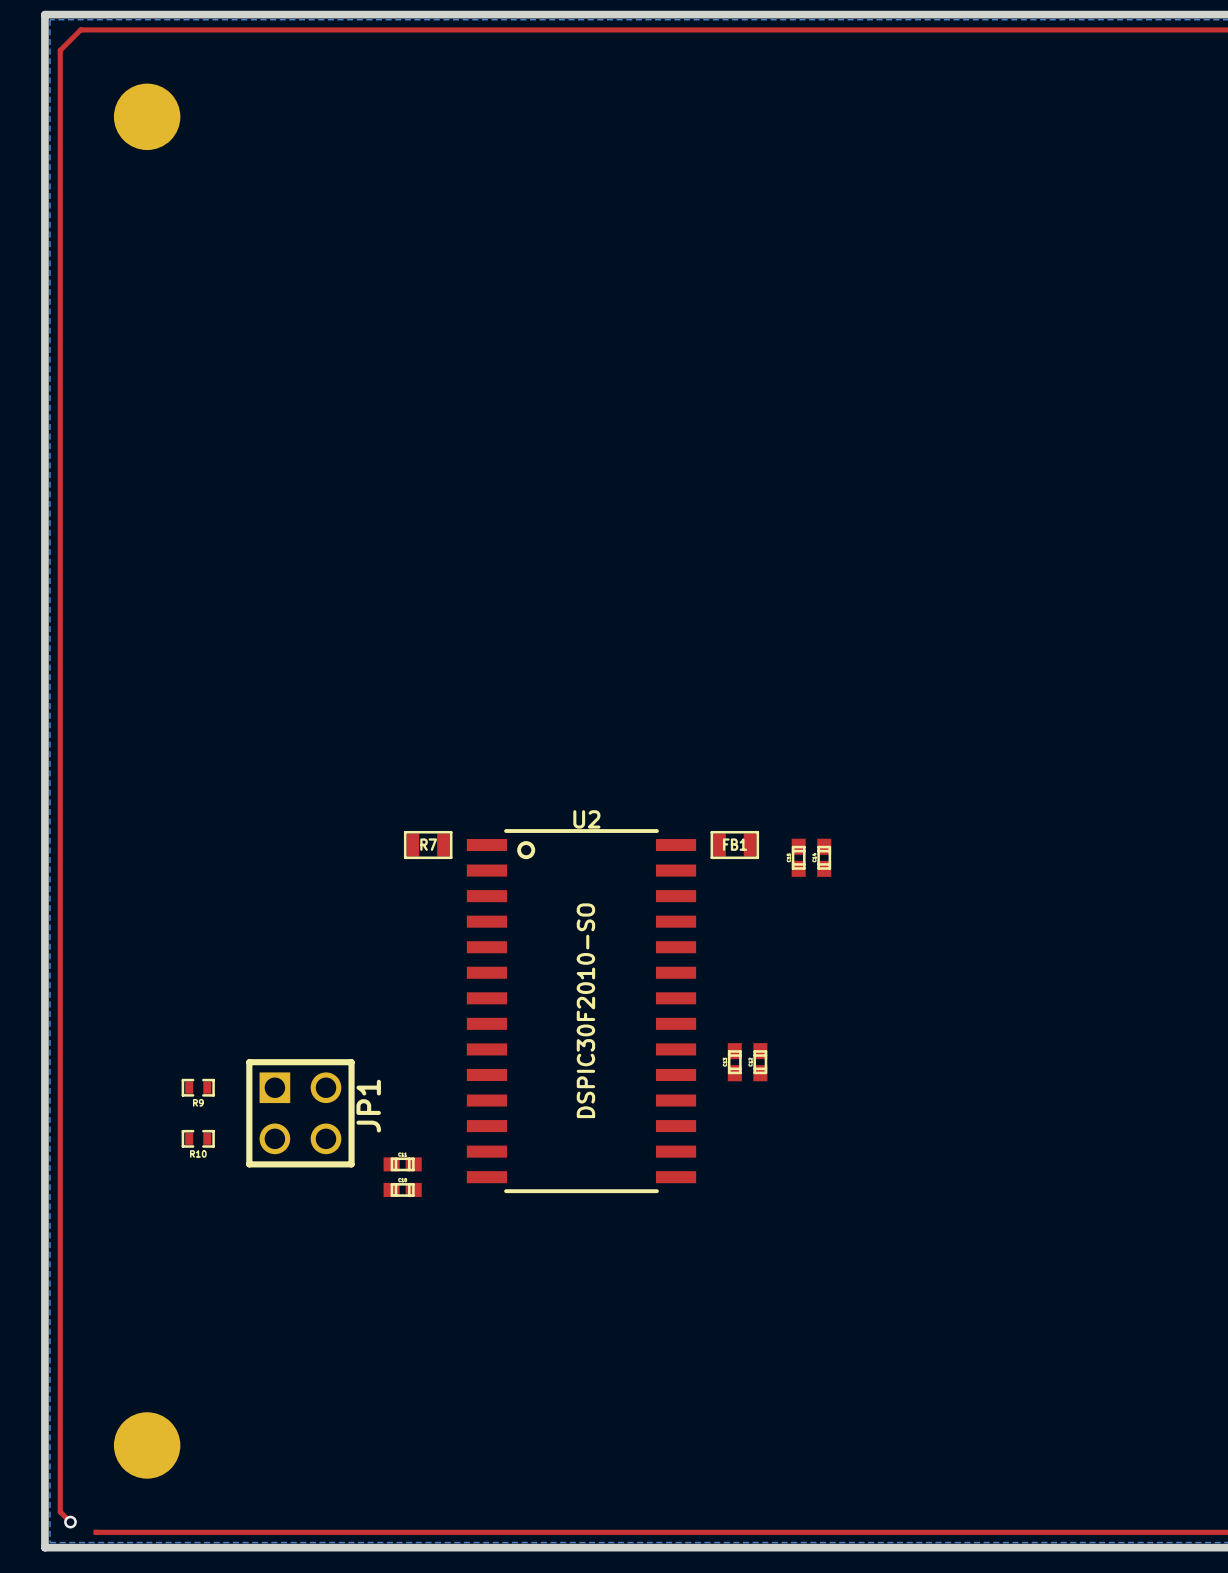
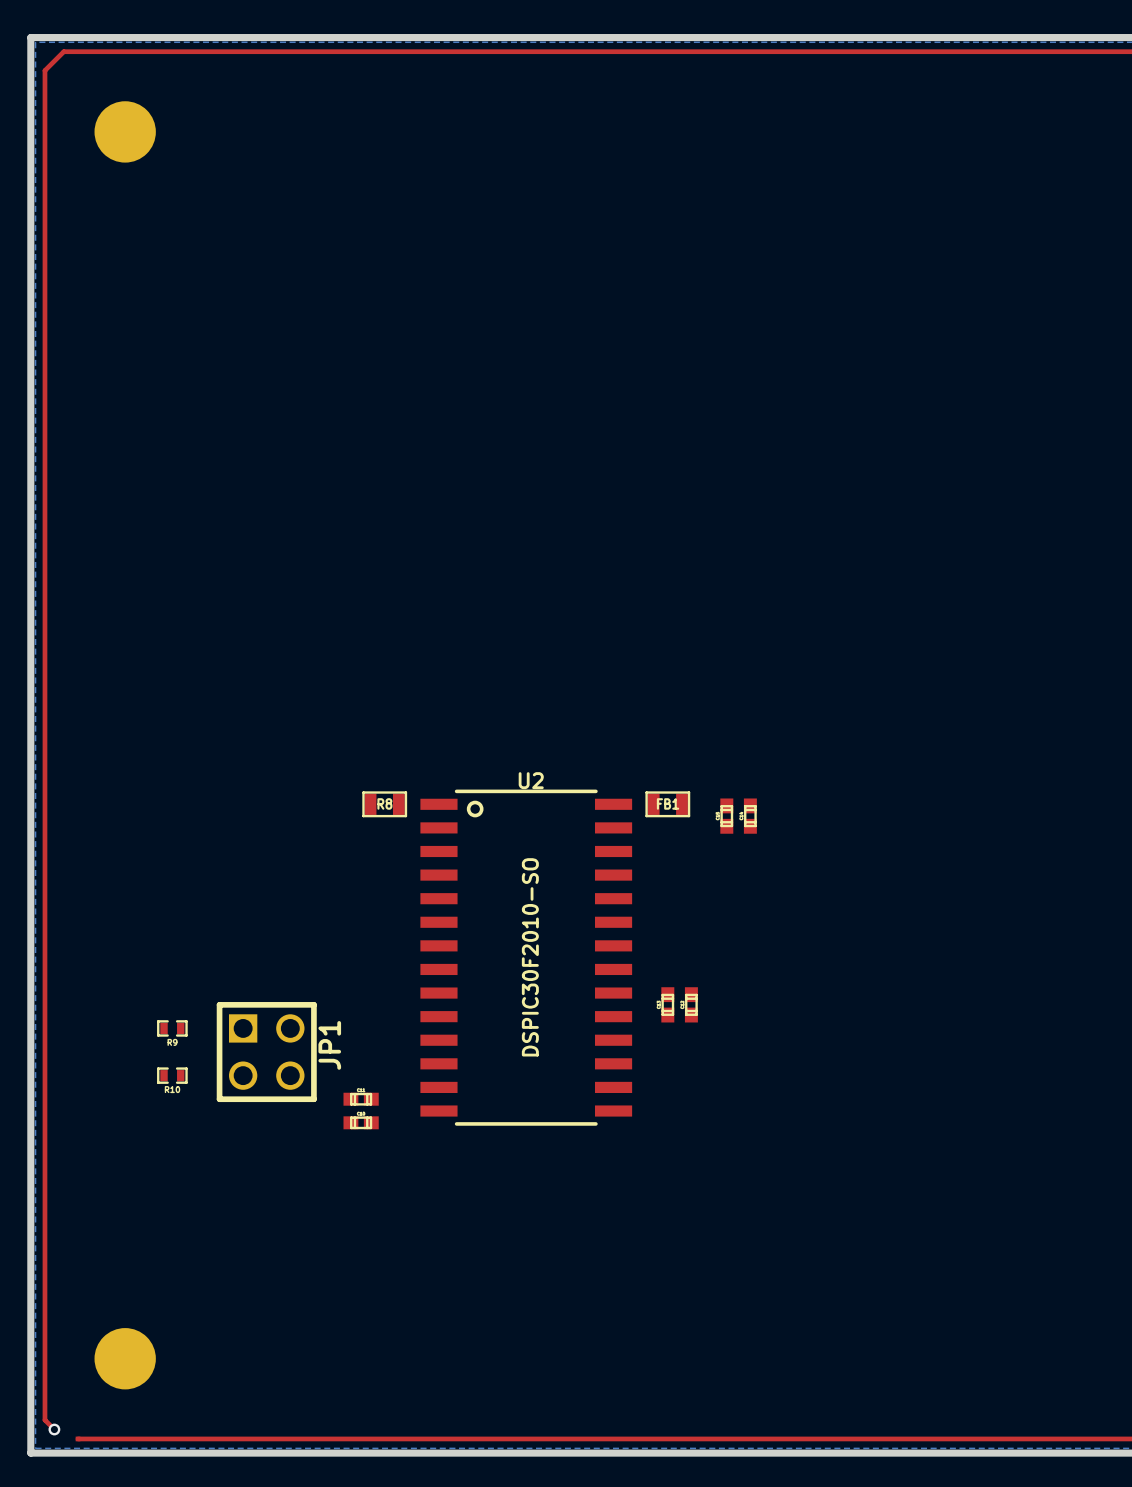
R7 name: R7 (428, 844) -> R8 (384, 803)

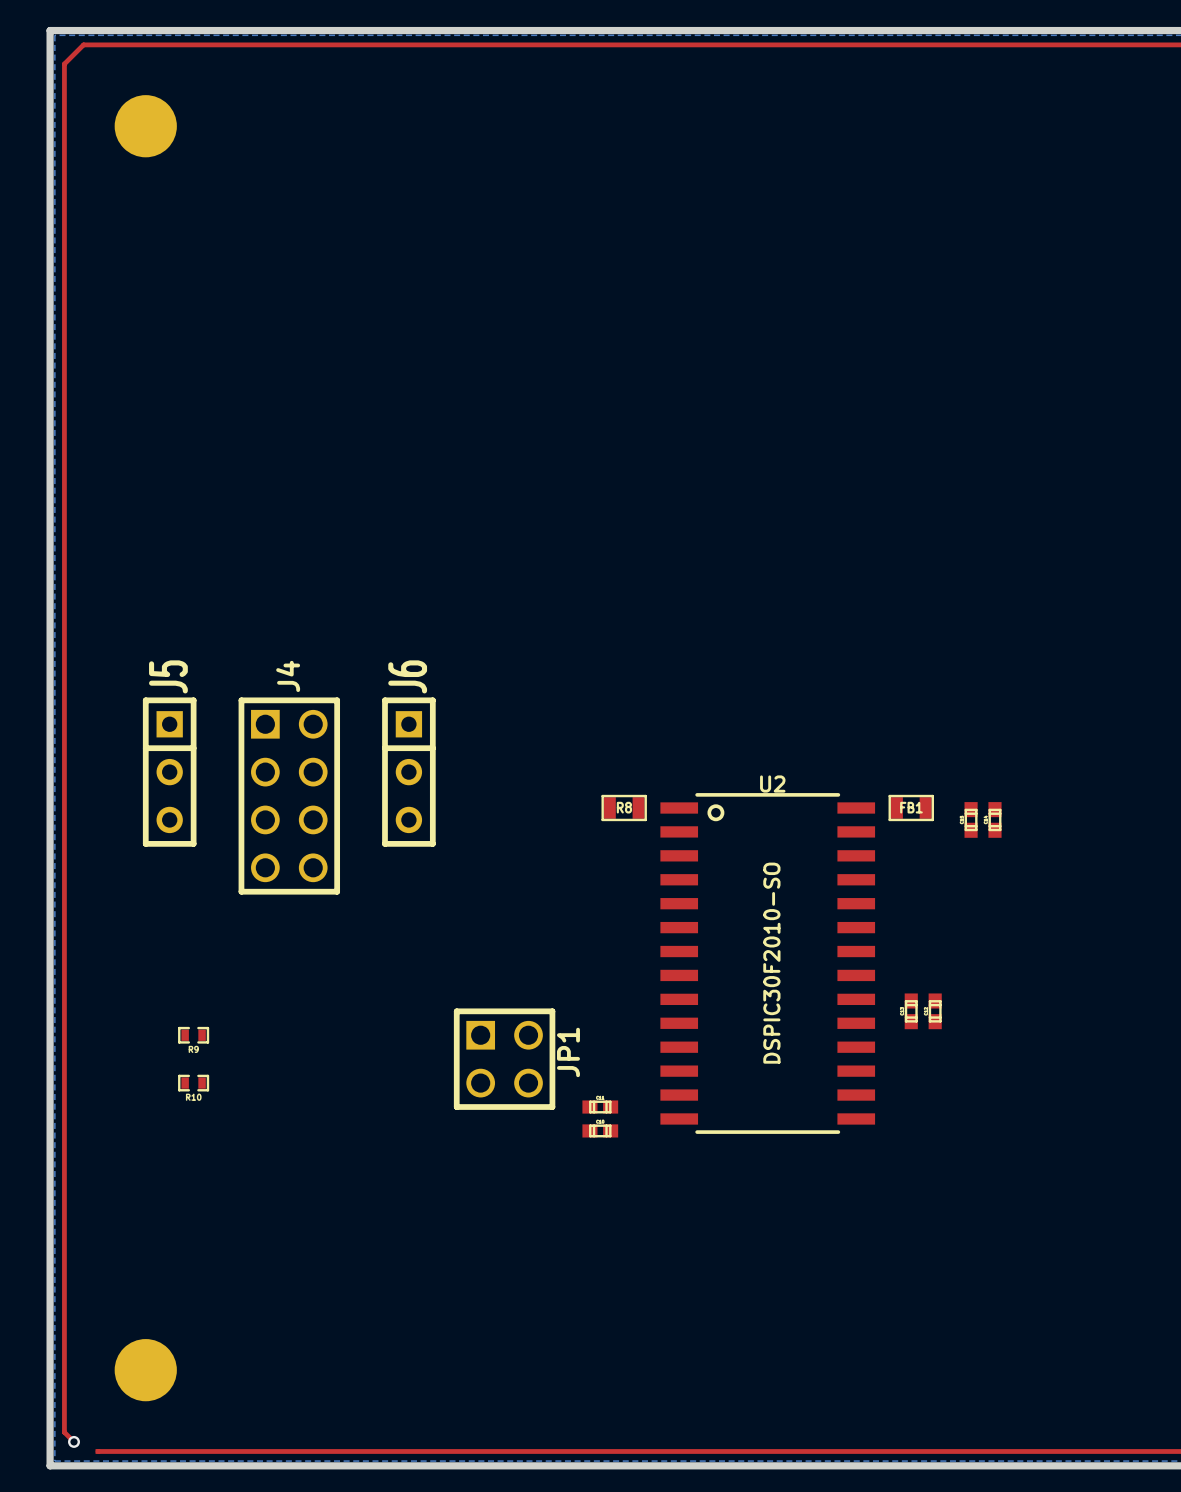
J5: none -> (169, 772)
J6: none -> (408, 772)
J4: none -> (289, 796)
R8 position: (384, 804) -> (624, 807)
FB1 position: (667, 804) -> (911, 807)
part position: (726, 816) -> (971, 819)
part position: (750, 816) -> (994, 819)
U2 position: (526, 957) -> (767, 963)
part position: (667, 1004) -> (911, 1011)
part position: (691, 1004) -> (935, 1011)
JP1 position: (266, 1052) -> (504, 1059)
part position: (361, 1099) -> (600, 1107)
part position: (361, 1122) -> (600, 1130)

